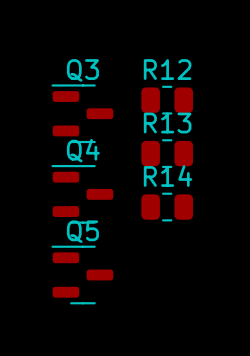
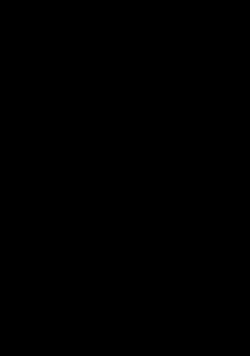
R12: (167, 100) -> none
Q3: (82, 113) -> none
R13: (167, 153) -> none
Q4: (82, 194) -> none
R14: (167, 207) -> none
Q5: (82, 275) -> none

